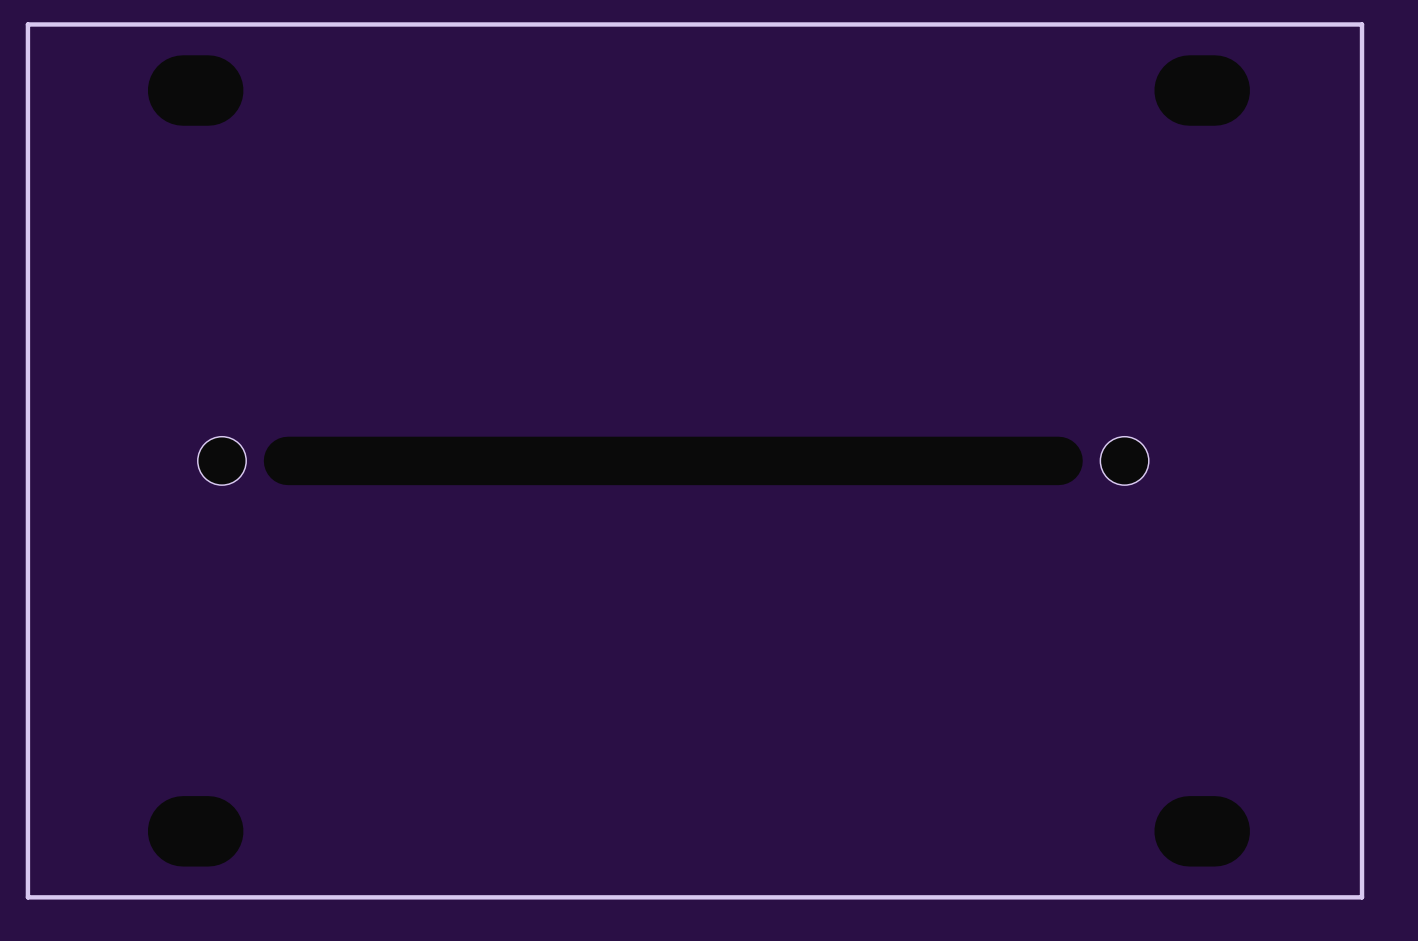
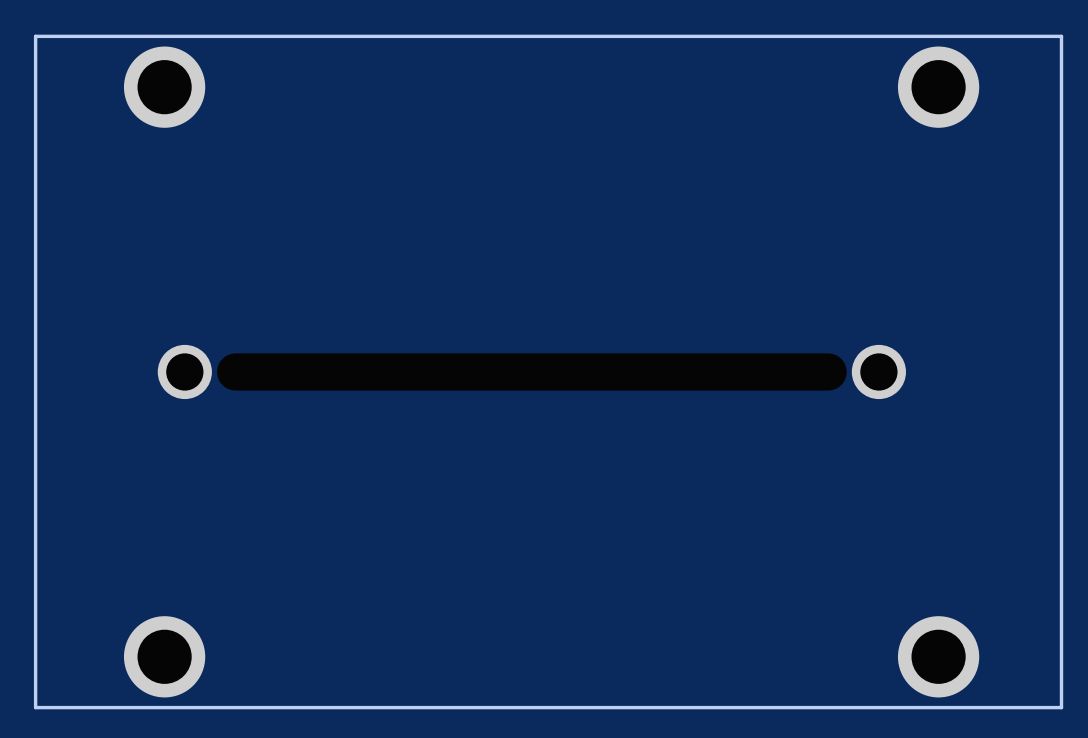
part footprint: [147, 55, 244, 126] -> [123, 46, 206, 128]
part footprint: [1154, 55, 1250, 126] -> [897, 46, 980, 128]
part footprint: [197, 436, 1149, 486] -> [157, 344, 907, 400]
part footprint: [147, 796, 244, 867] -> [123, 616, 206, 698]
part footprint: [1154, 796, 1250, 867] -> [897, 616, 980, 698]

